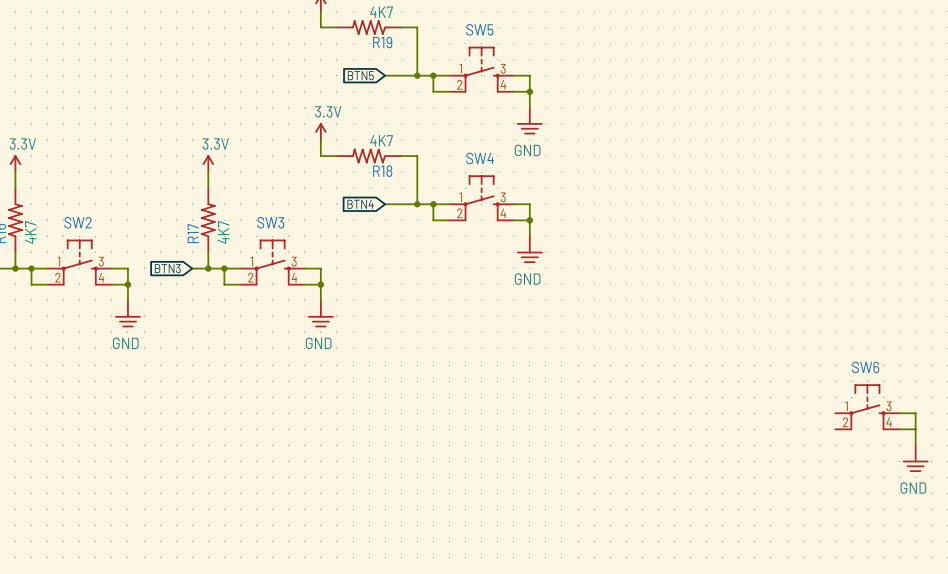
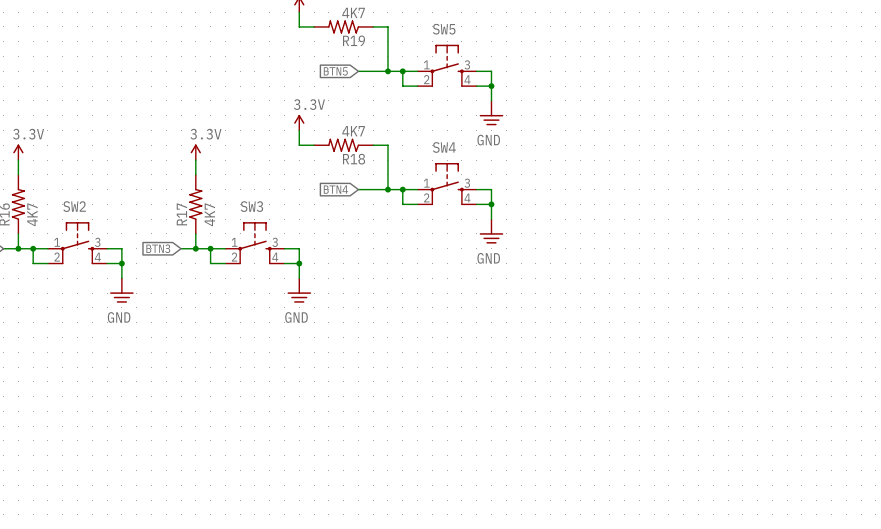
SW6: (867, 407) -> none
wire: (899, 413) (915, 413) (915, 445) -> none
wire: (899, 429) (915, 429) -> none
power symbol: GND (915, 458) -> none

